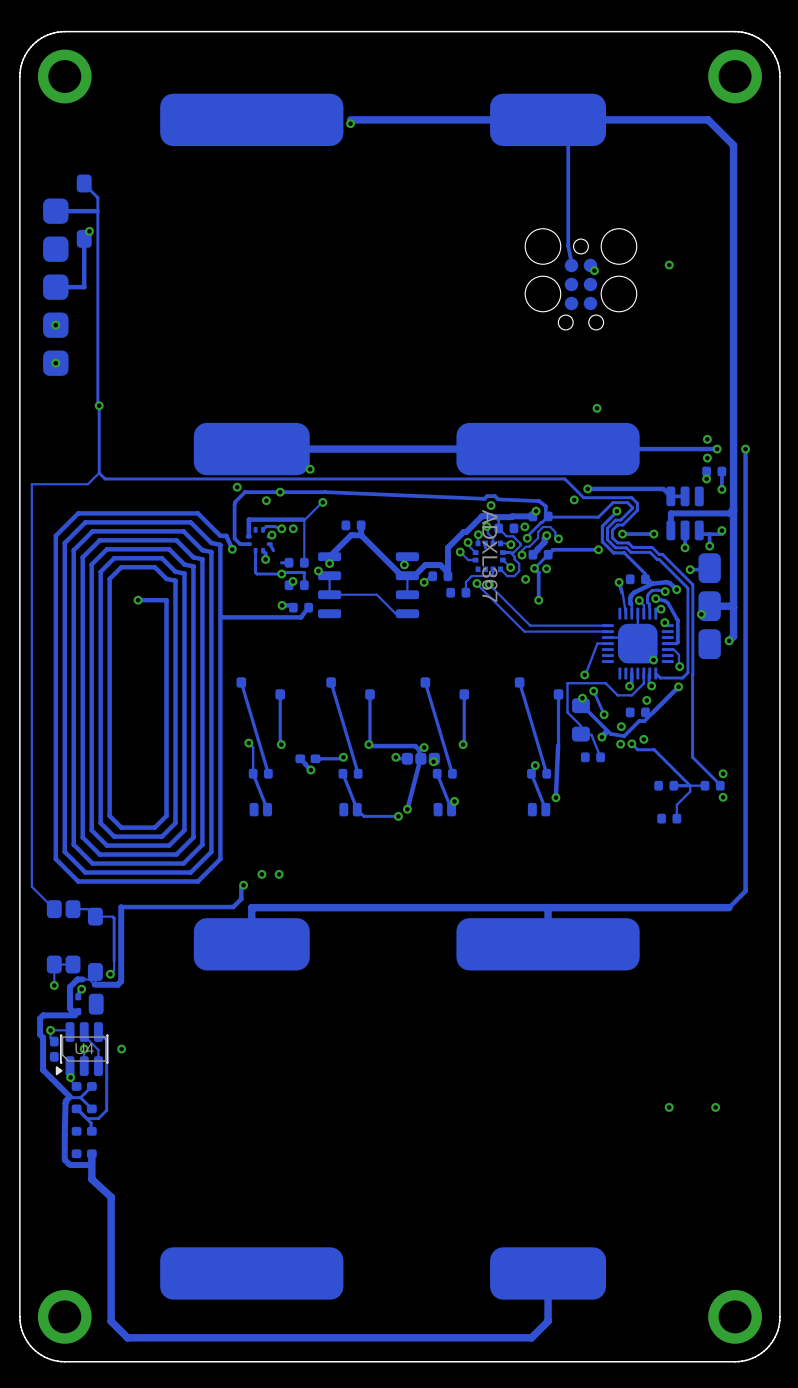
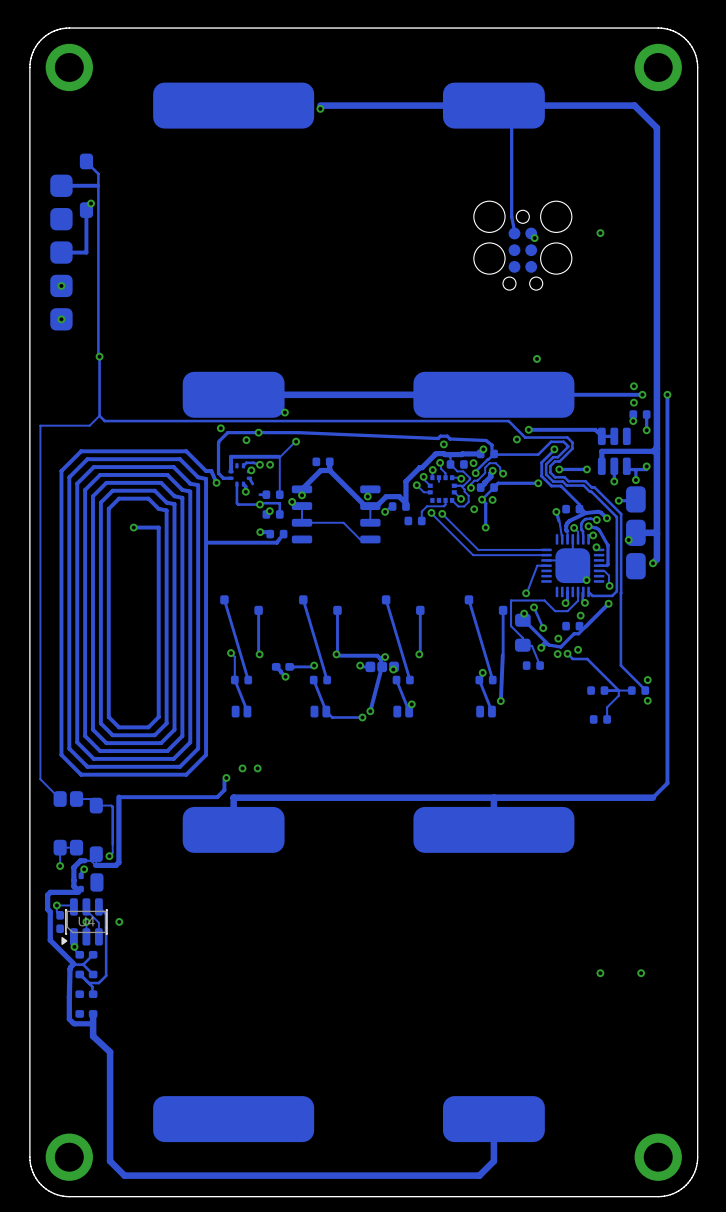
part value: ADXL367 (489, 555) -> none

